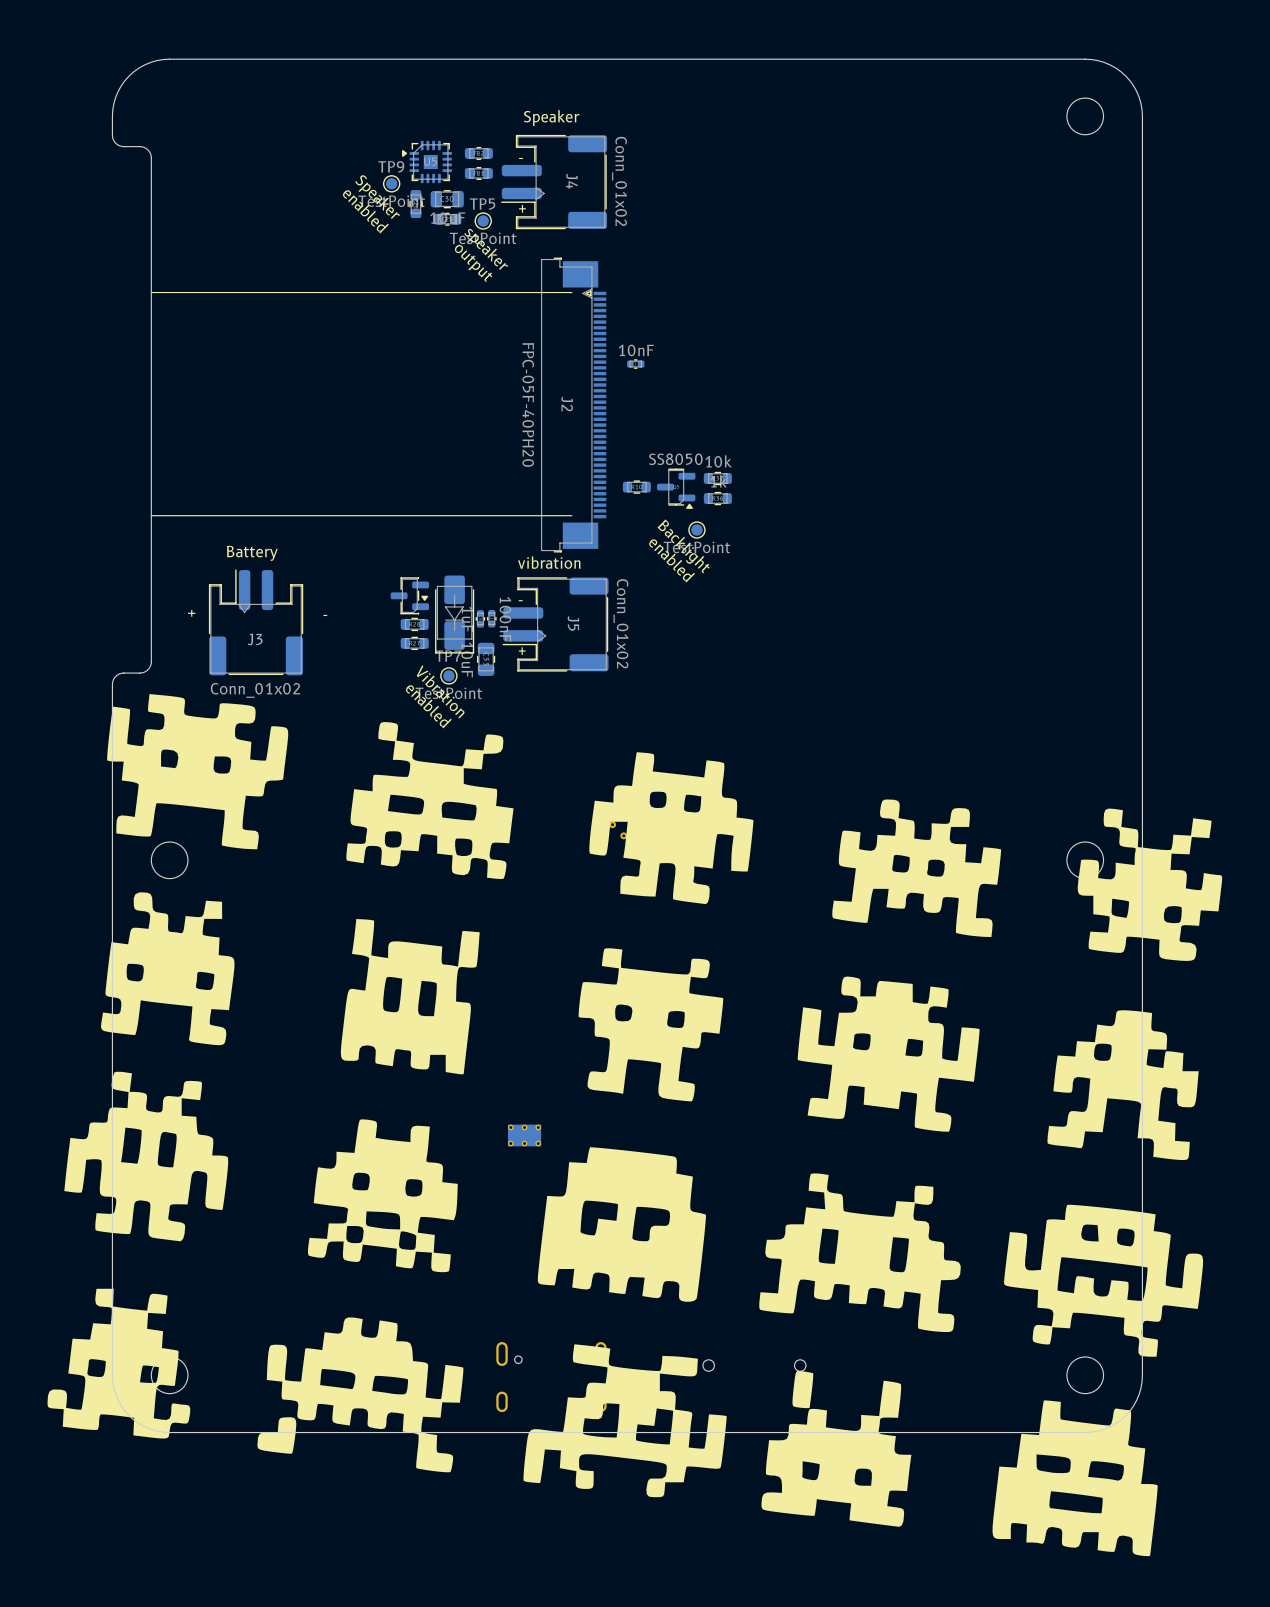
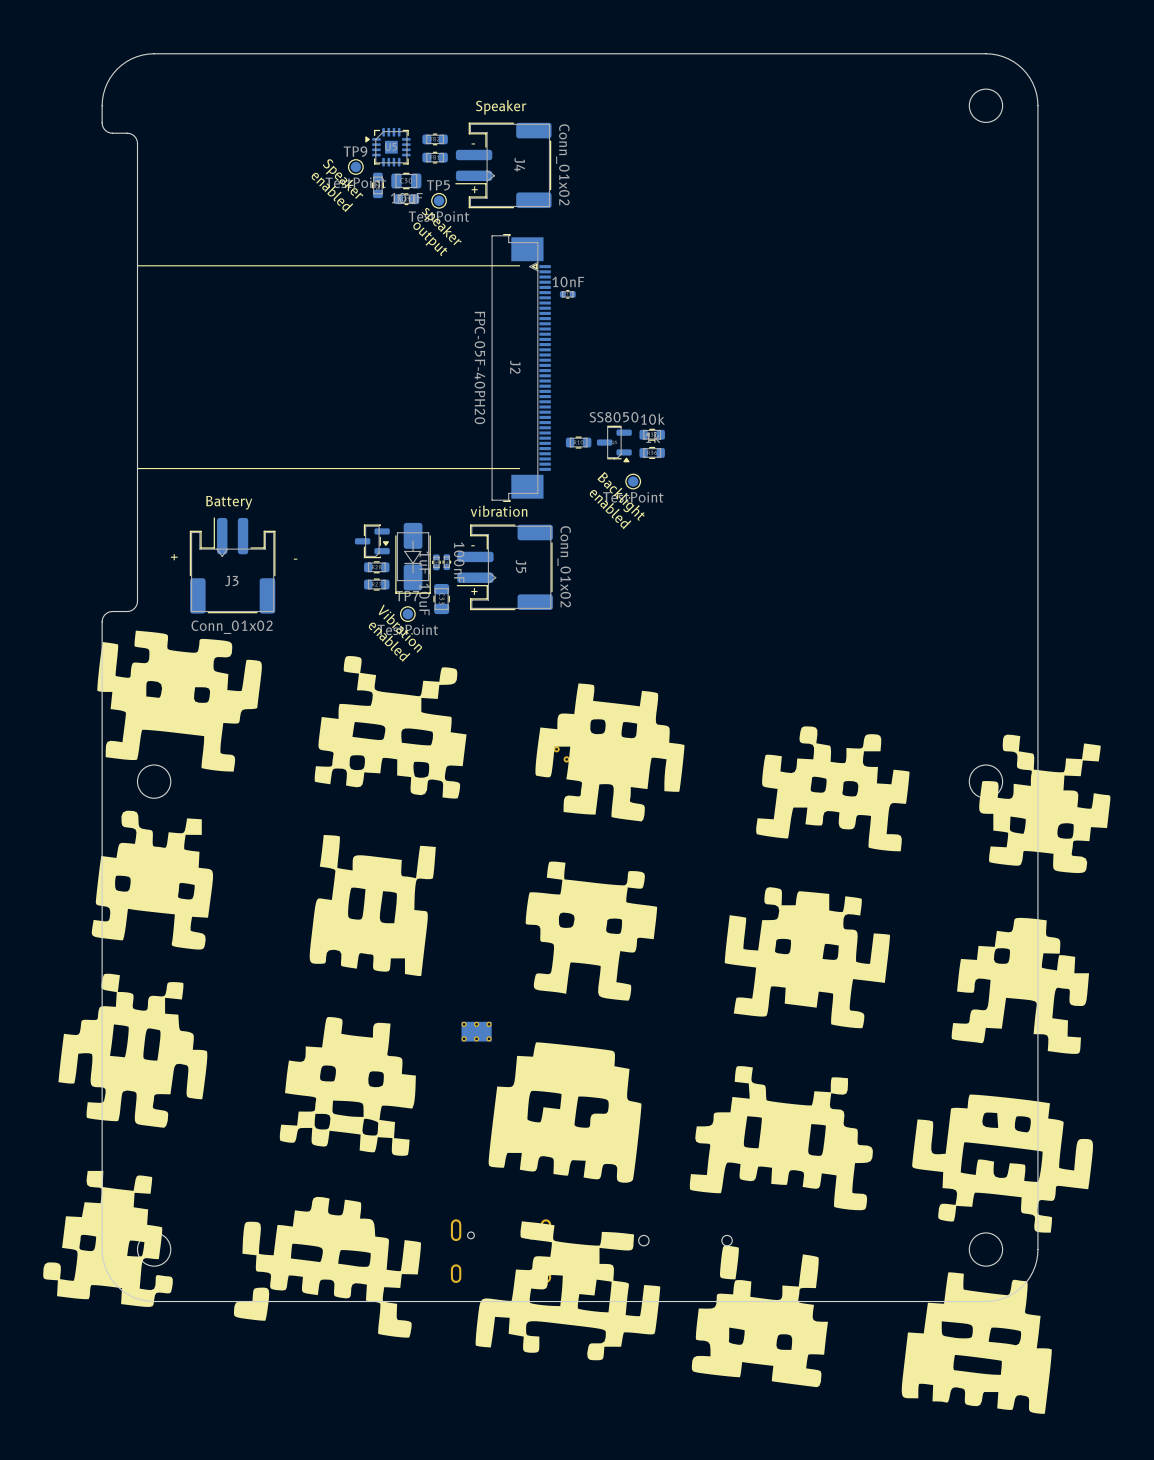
part position: (635, 364) -> (567, 294)

